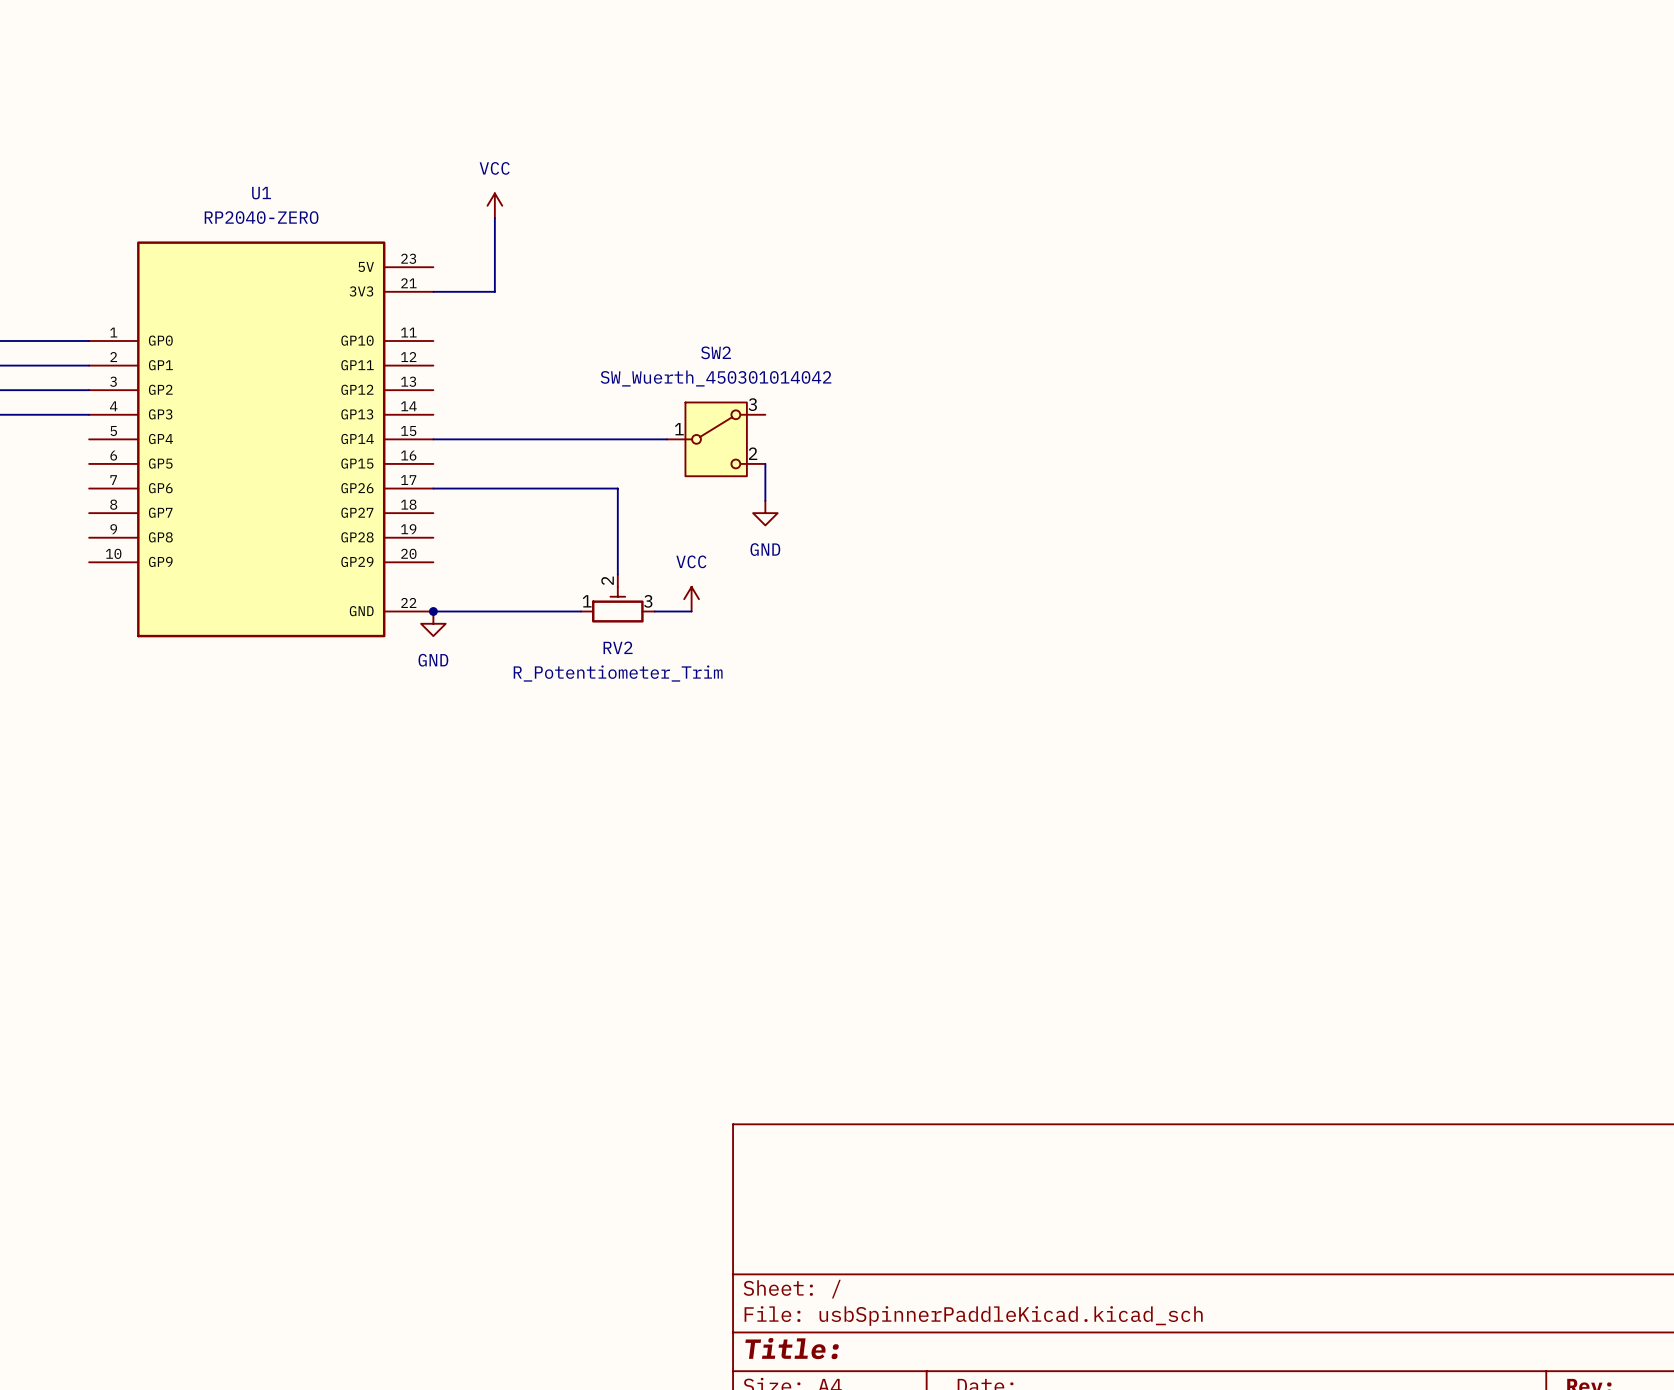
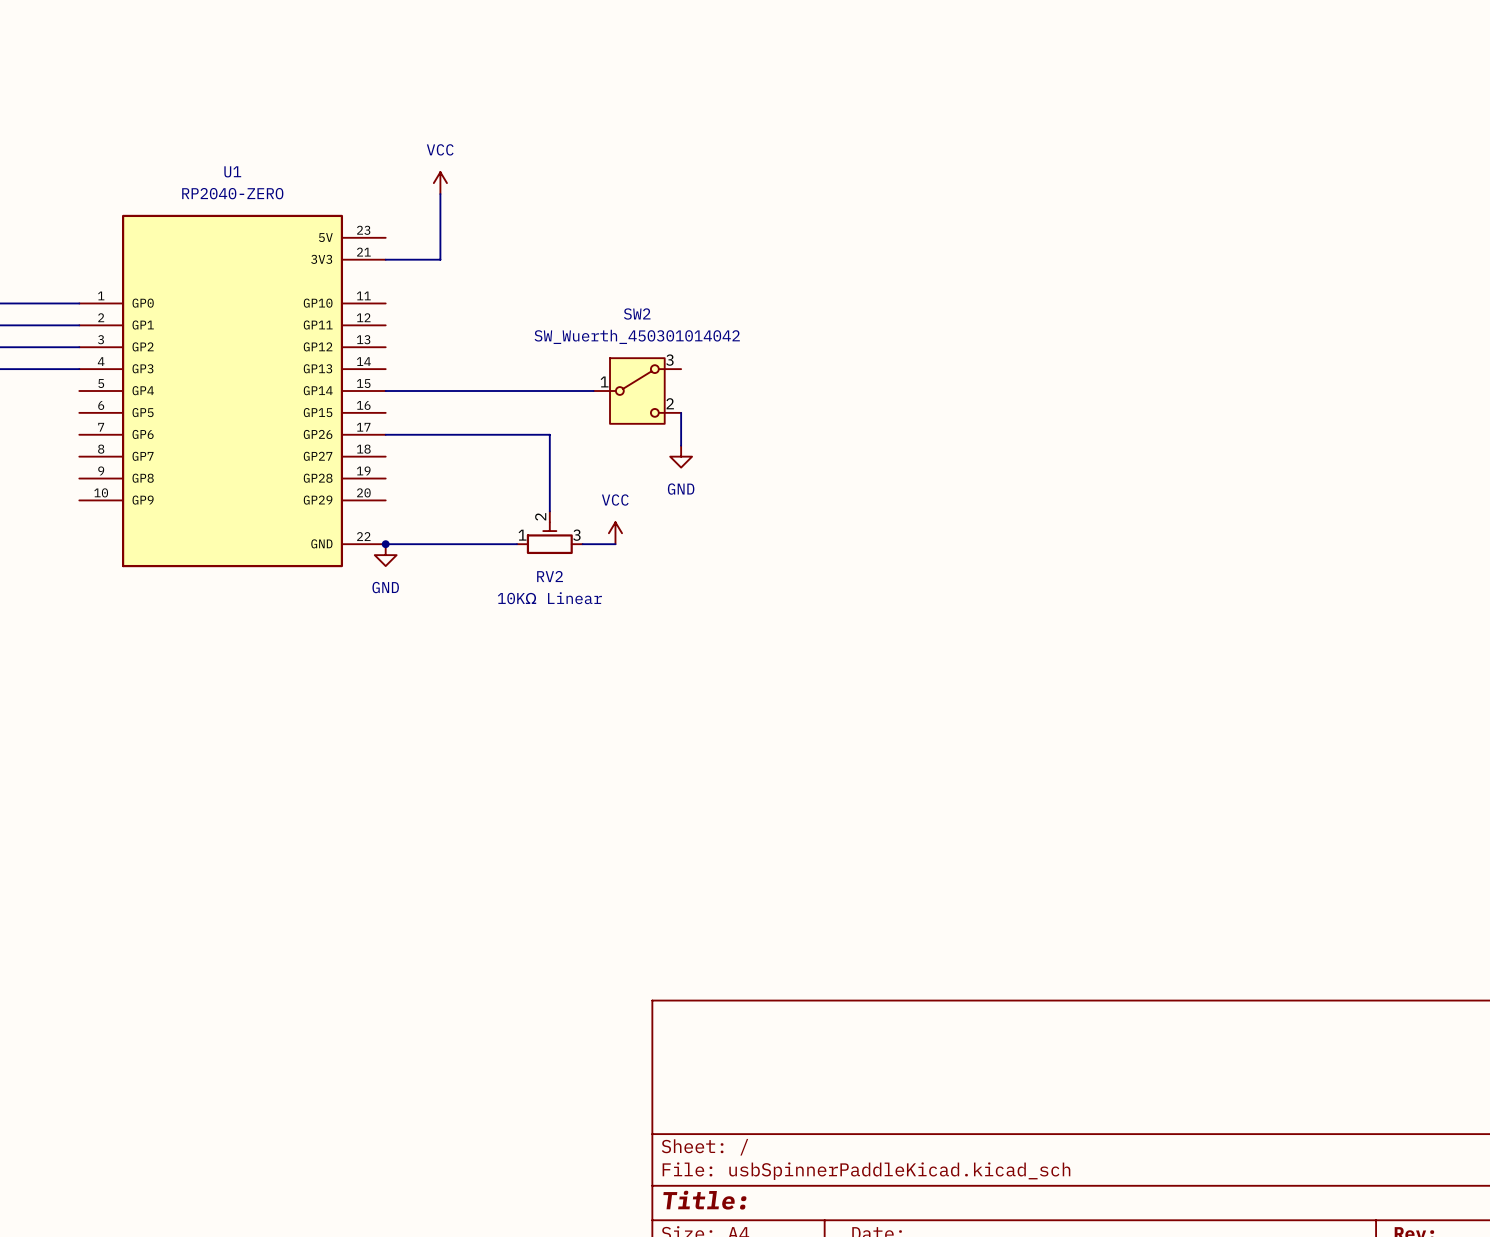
RV2 value: R_Potentiometer_Trim (618, 673) -> 10KΩ Linear (549, 598)

